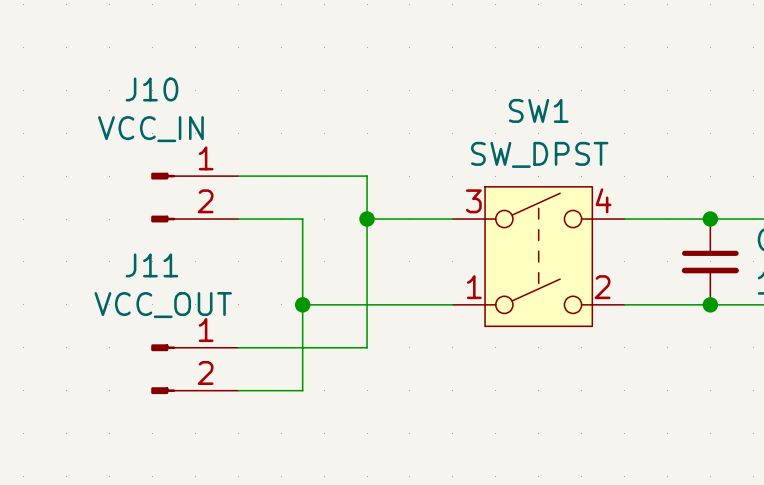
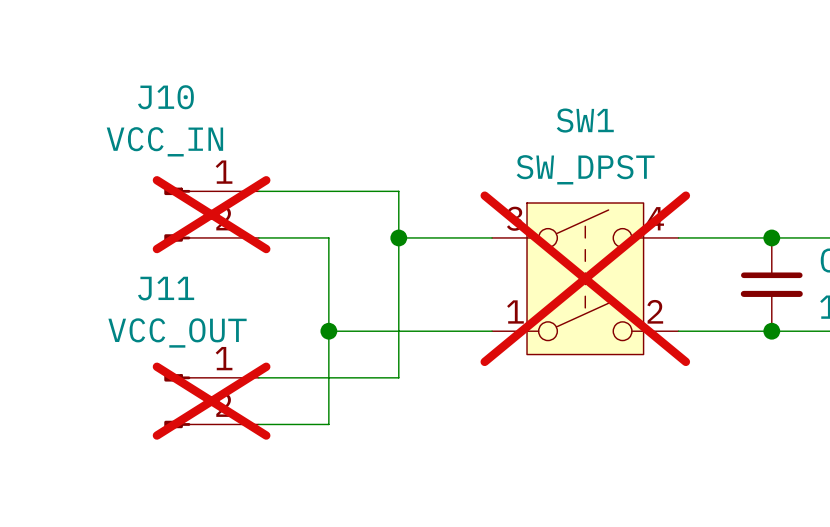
J10 do-not-place cross: none -> (211, 214)
SW1 do-not-place cross: none -> (585, 278)
J11 do-not-place cross: none -> (211, 401)

